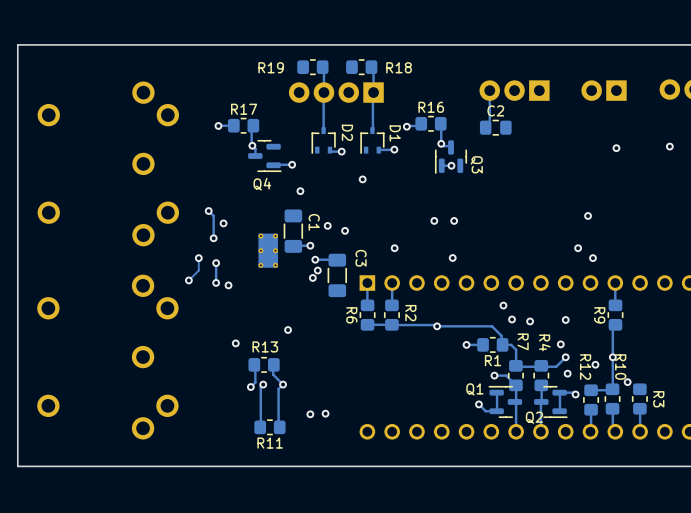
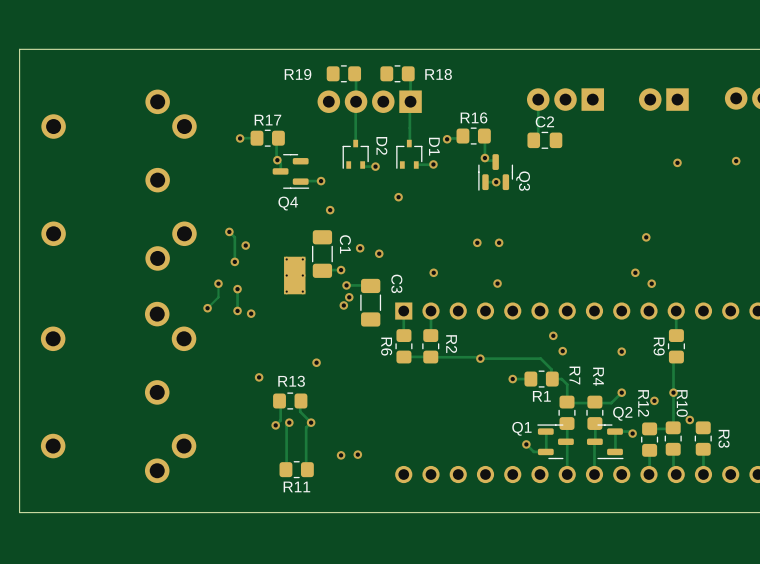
via: (530, 321) -> none
via: (560, 344) -> none
via: (567, 373) -> none
track: (494, 375) (506, 375) (515, 385) -> none
via: (494, 375) -> none
Q2 name position: Q2 (534, 417) -> Q2 (622, 413)

